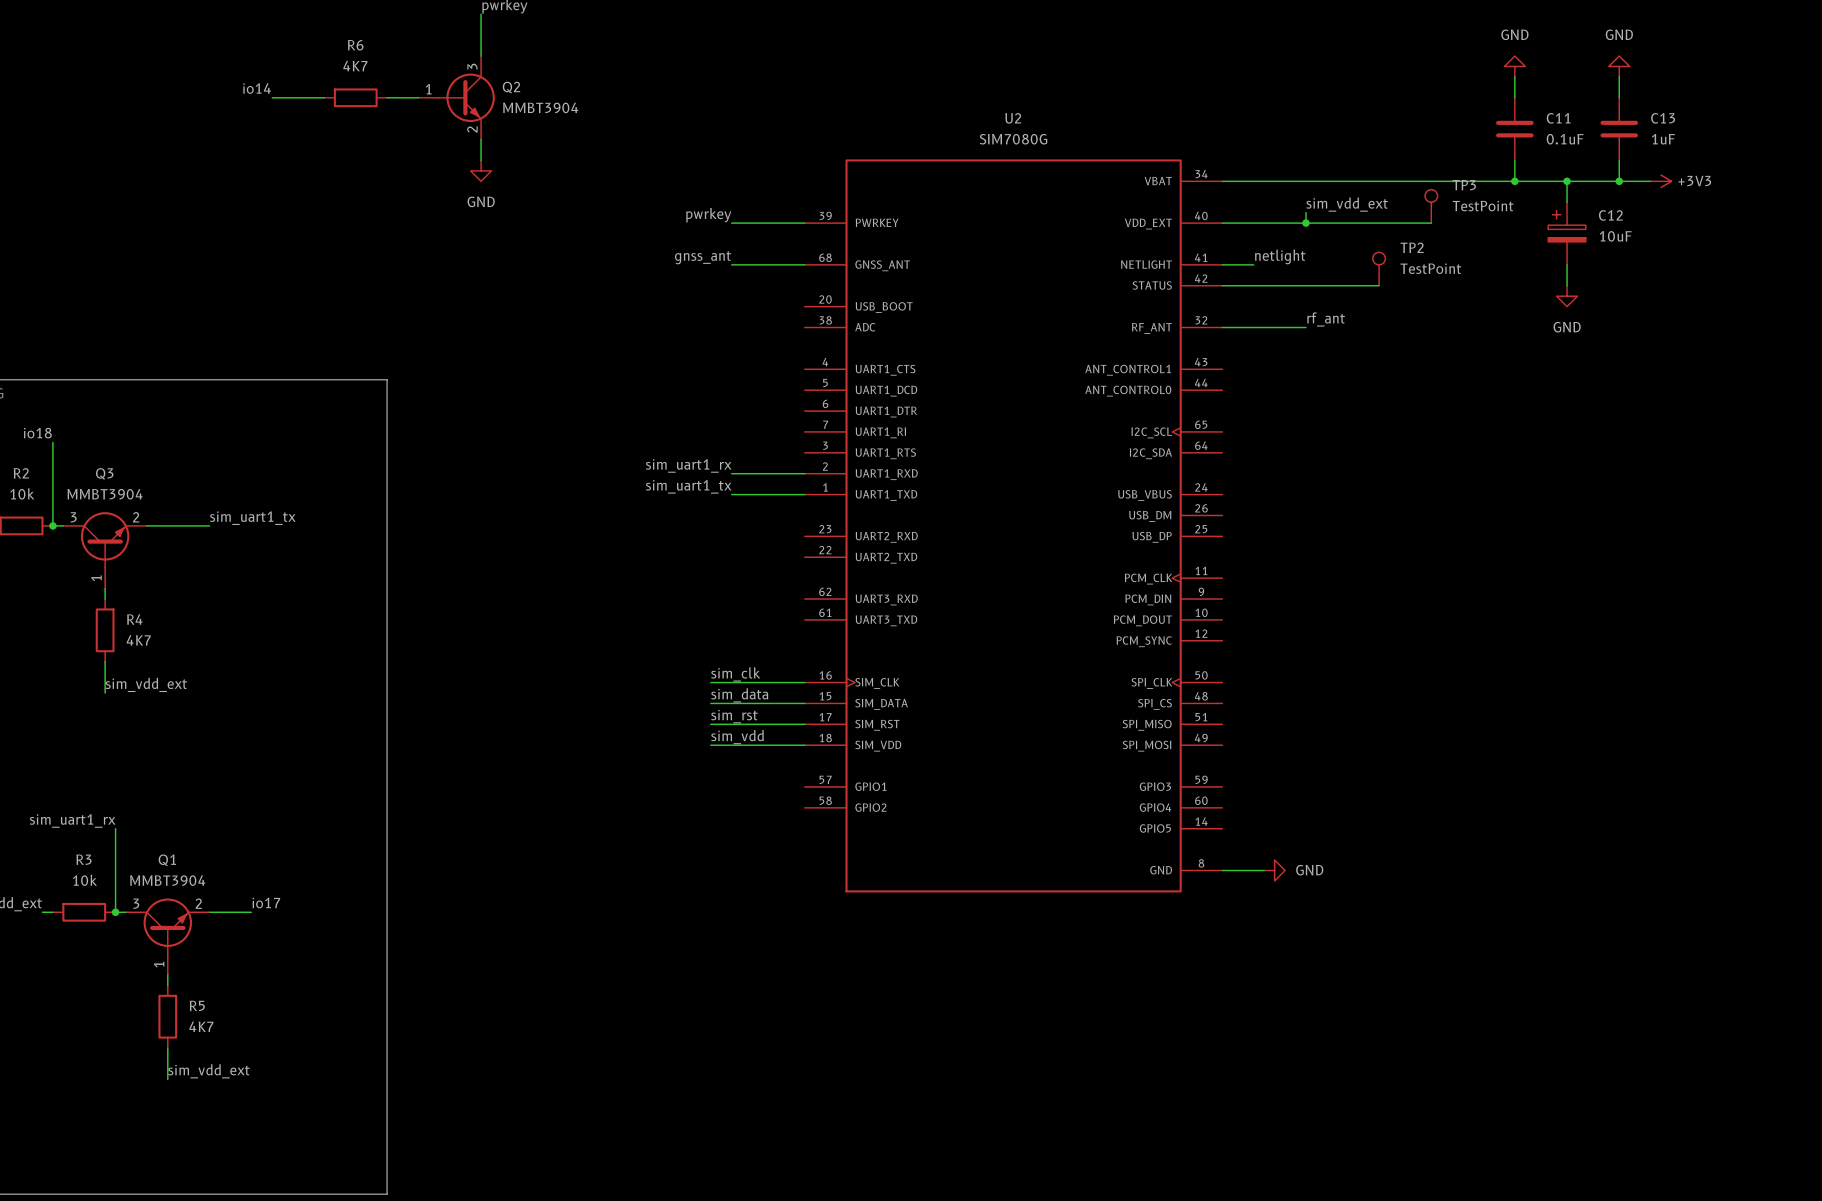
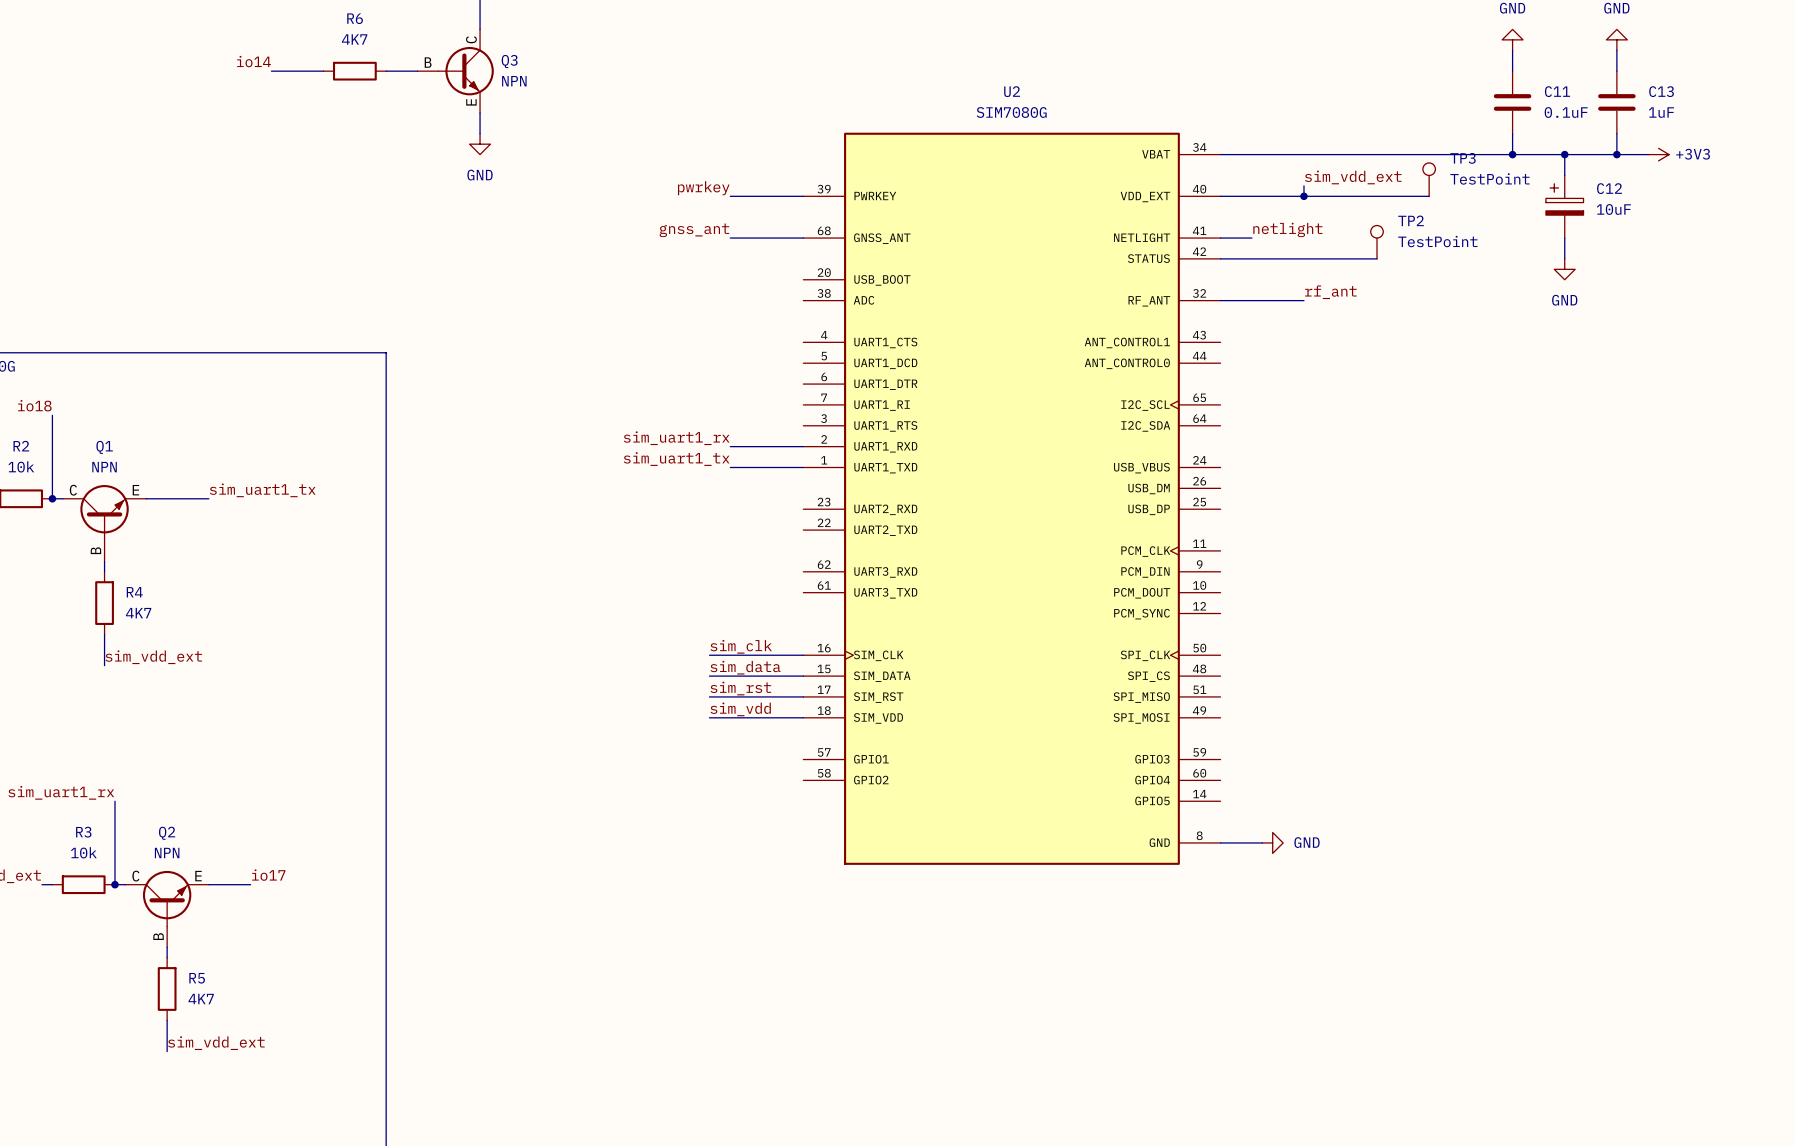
Q2 symbol: [418, 56, 495, 140] -> [125, 870, 209, 948]
Q2 name position: Q2 (511, 87) -> Q2 (167, 833)
Q2 value: MMBT3904 (540, 107) -> NPN (167, 853)
Q3 name position: Q3 (104, 473) -> Q3 (509, 61)
Q3 value: MMBT3904 (105, 494) -> NPN (514, 81)
Q3 symbol: [63, 512, 147, 589] -> [417, 29, 494, 113]
Q1 value: MMBT3904 (167, 880) -> NPN (104, 467)
Q1 symbol: [126, 898, 210, 975] -> [62, 485, 147, 562]

